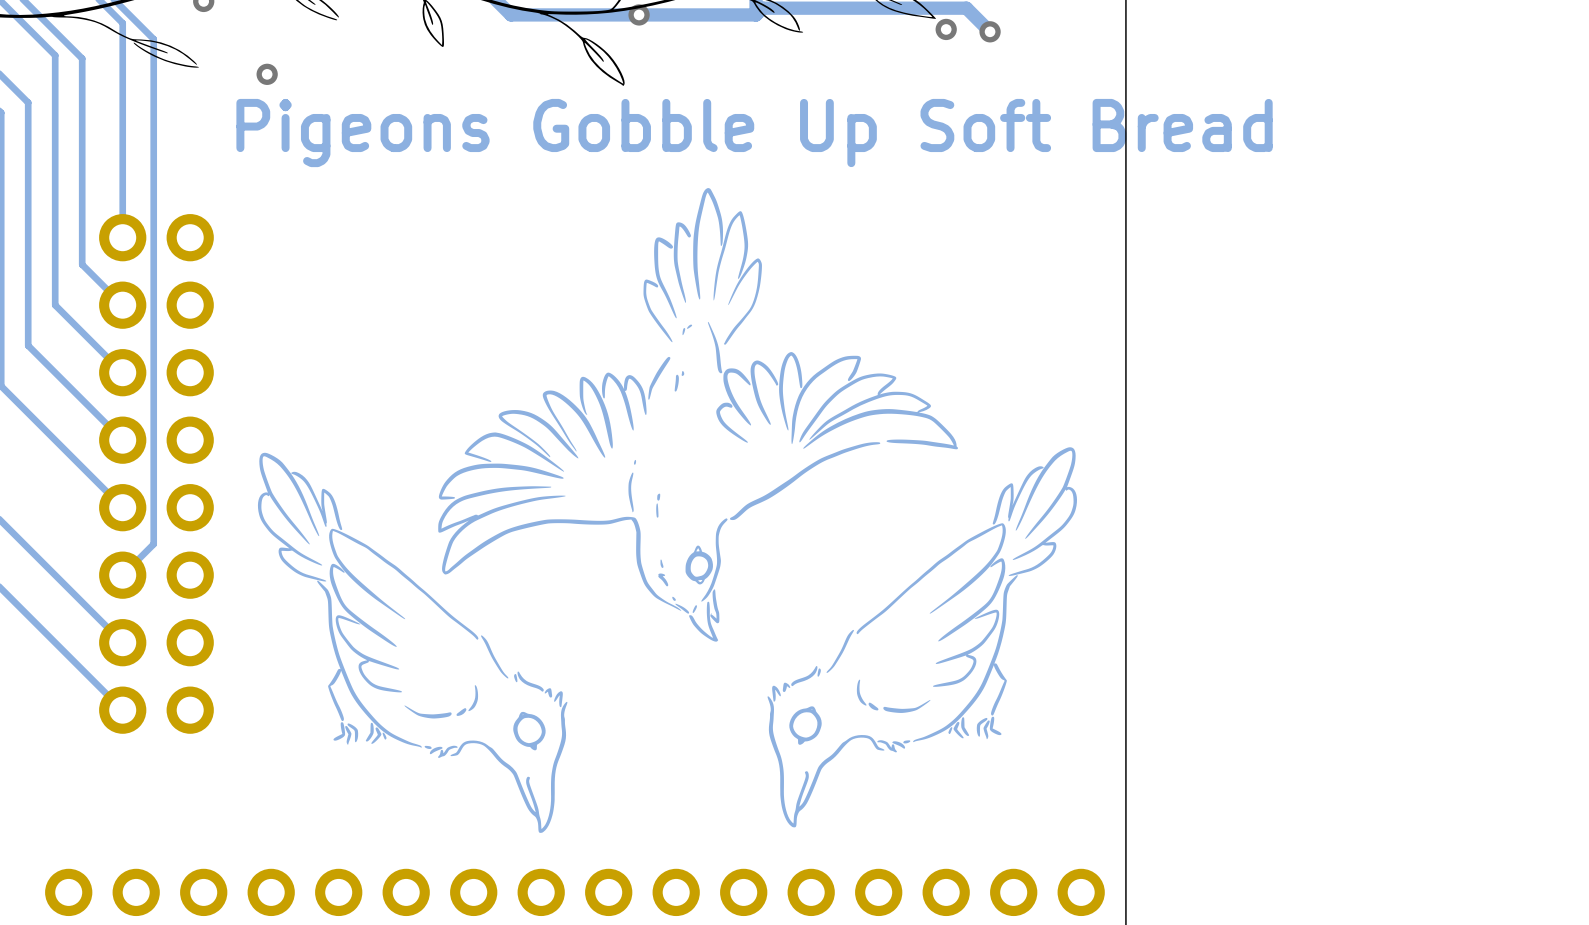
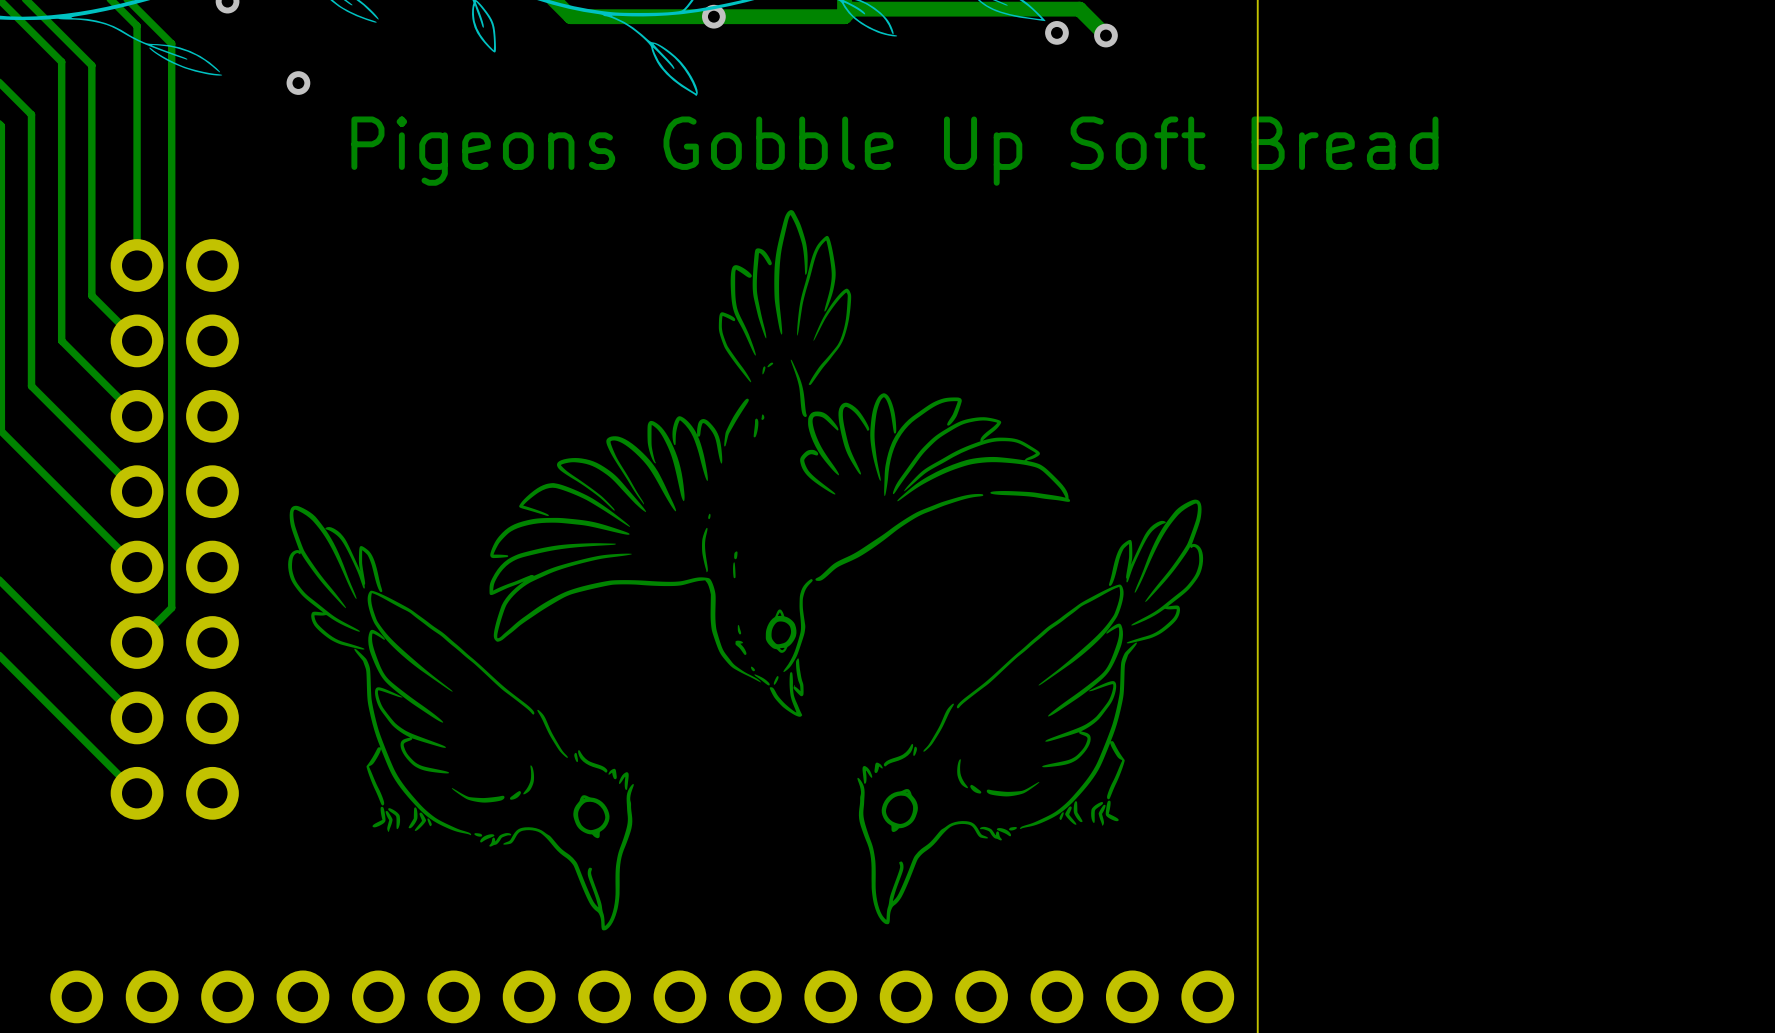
drawing: [236, 98, 1273, 168] -> none
drawing: none -> [351, 116, 1439, 186]

